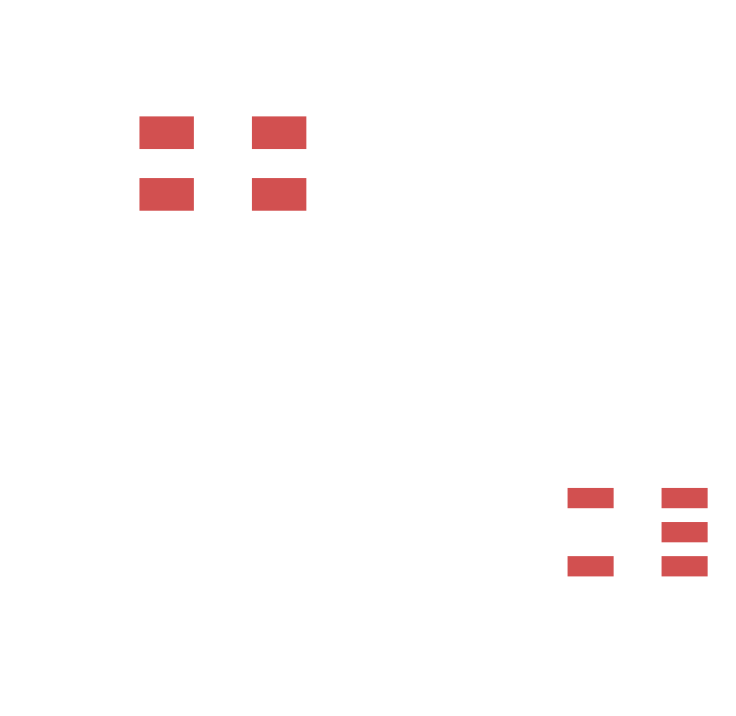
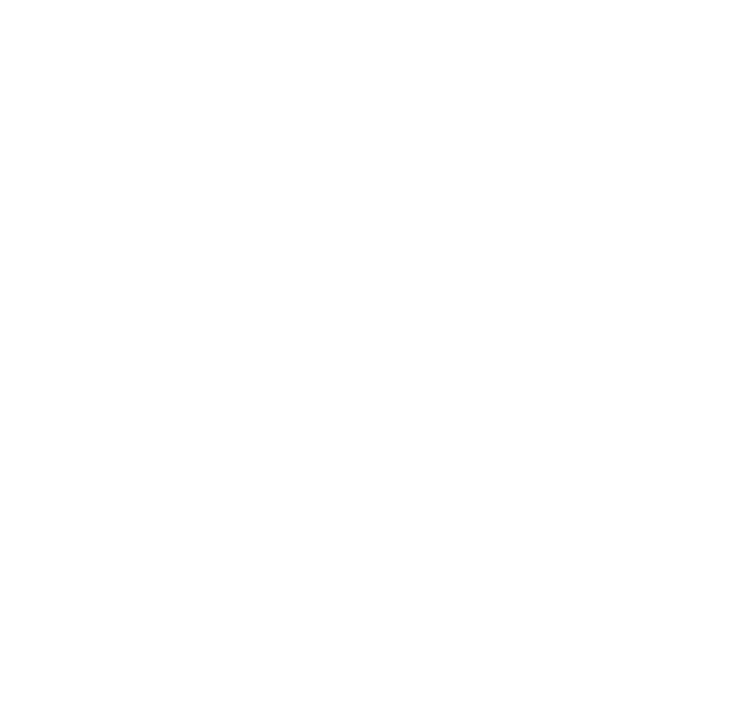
part: (222, 163) -> none
part: (637, 532) -> none

